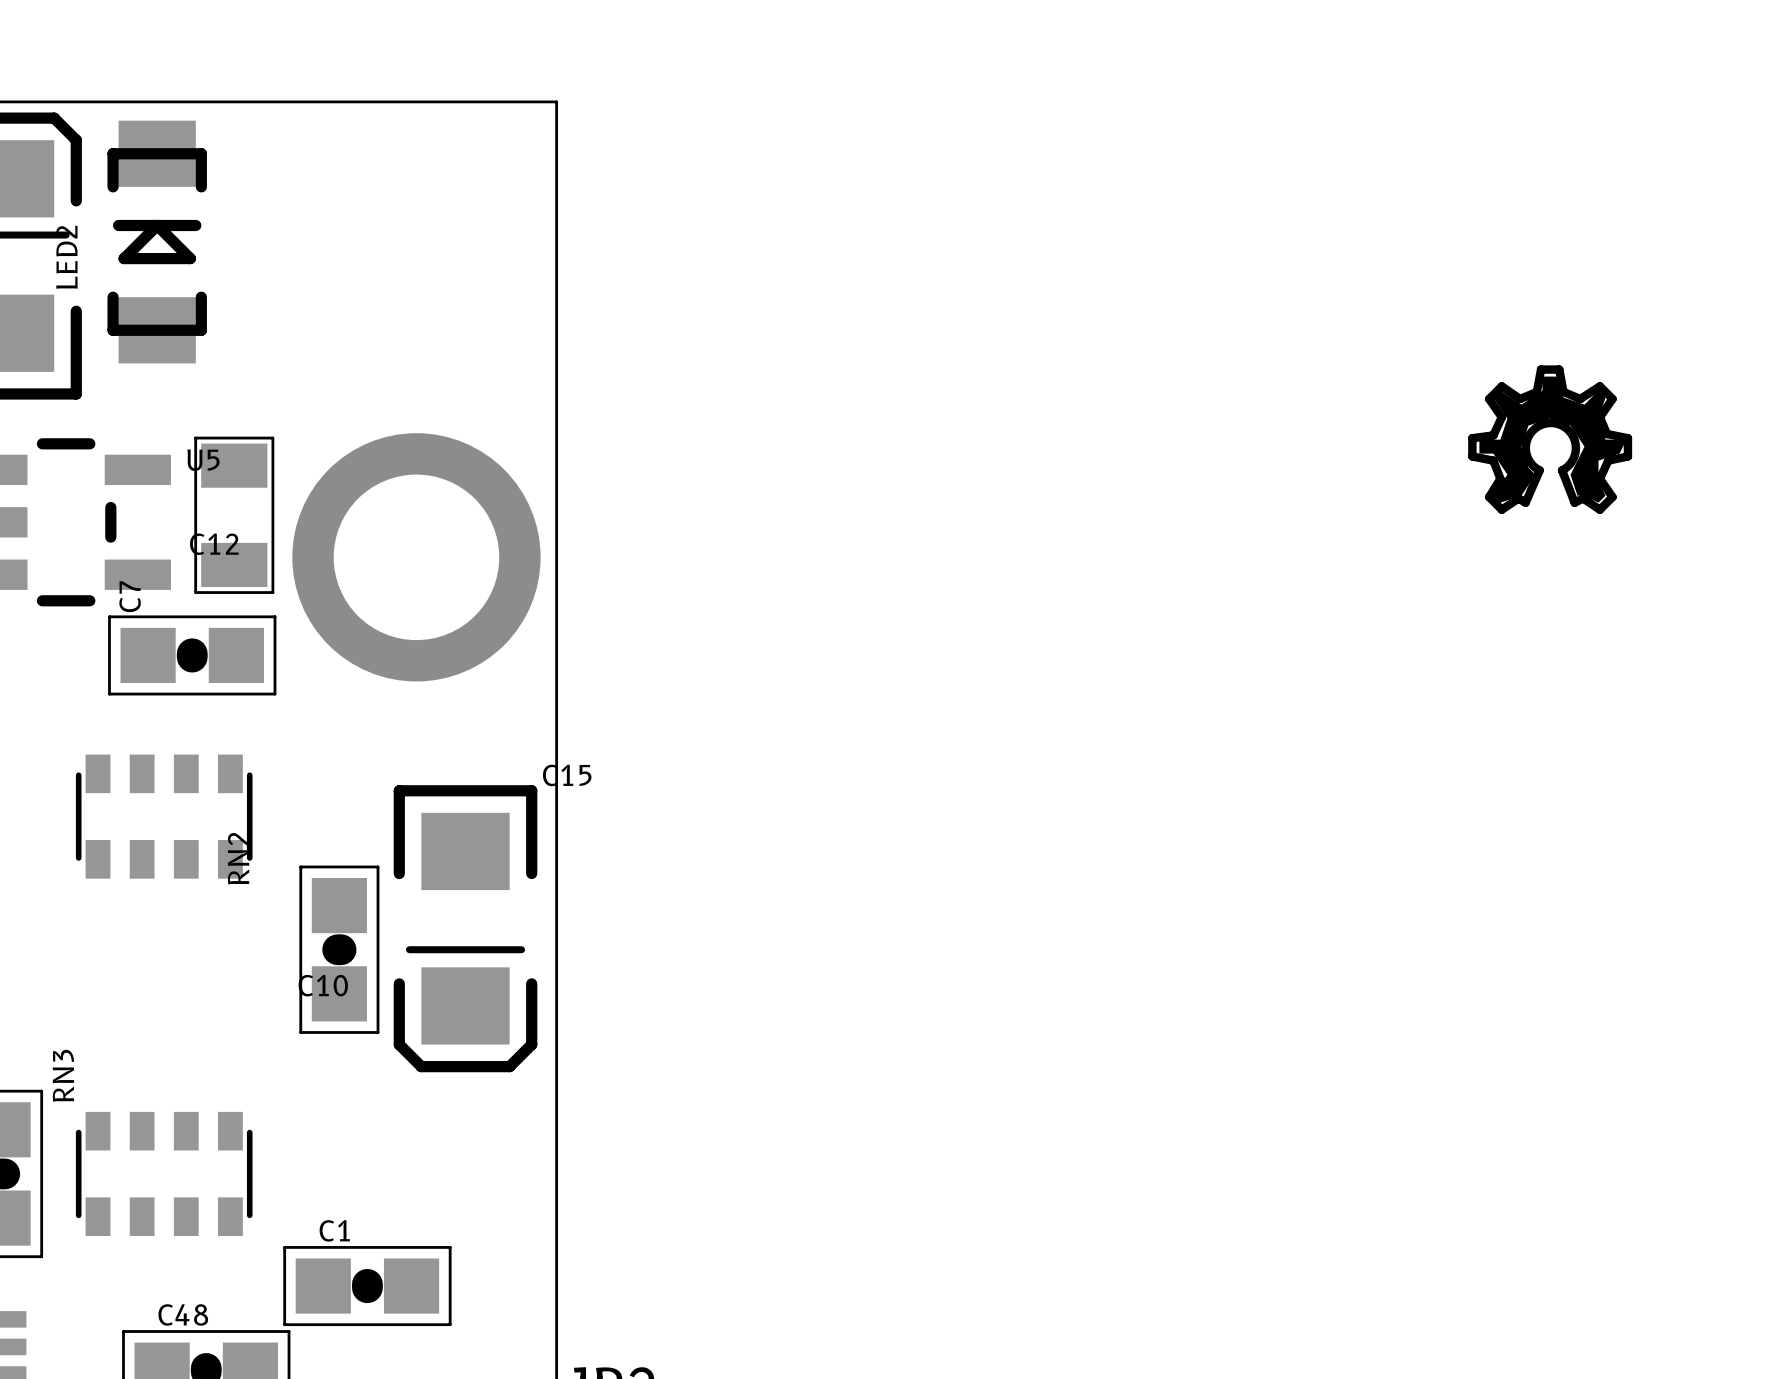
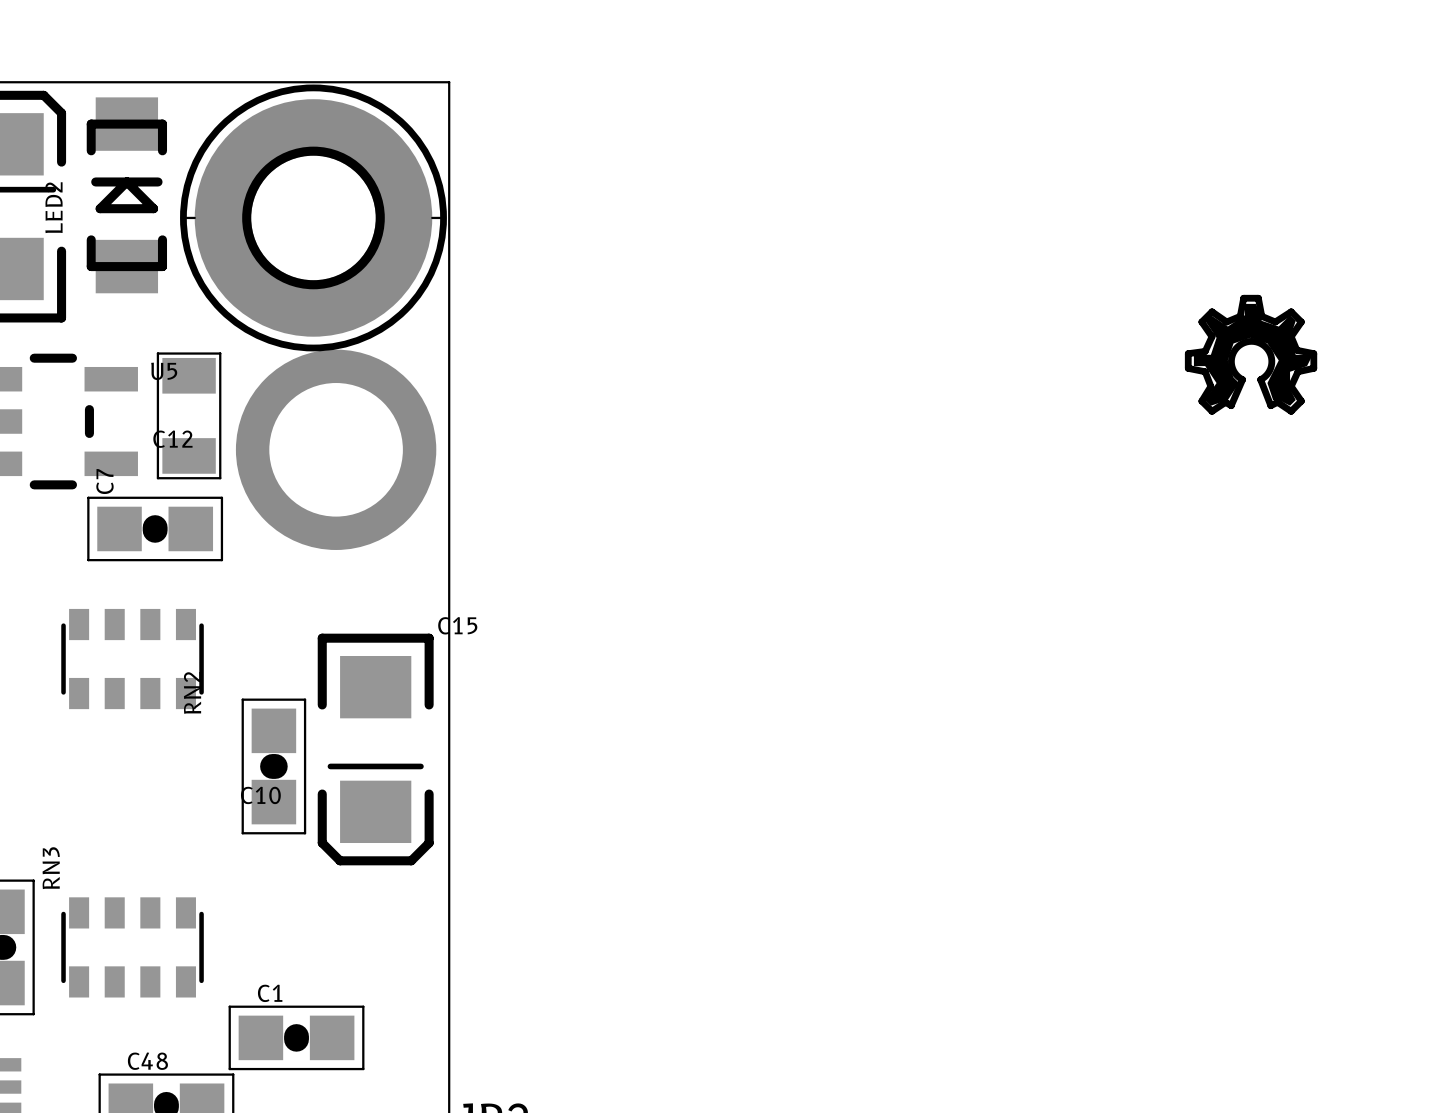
part: none -> (313, 217)

